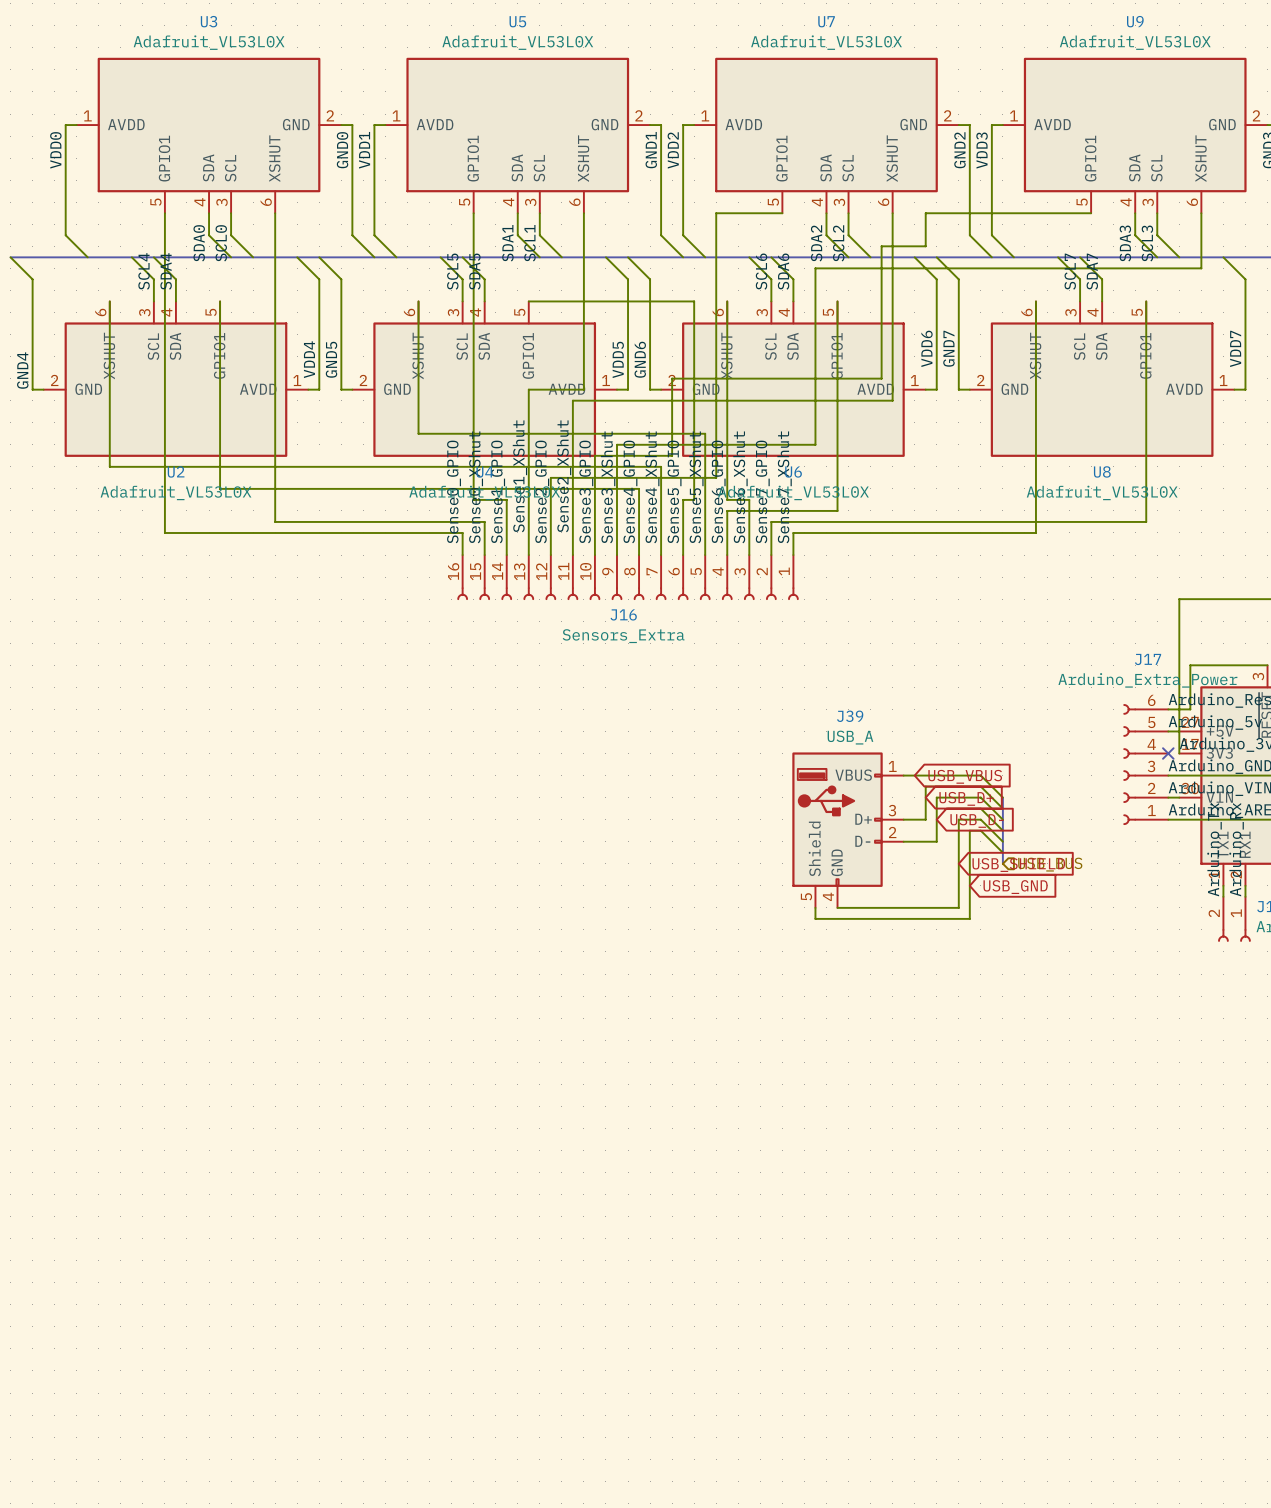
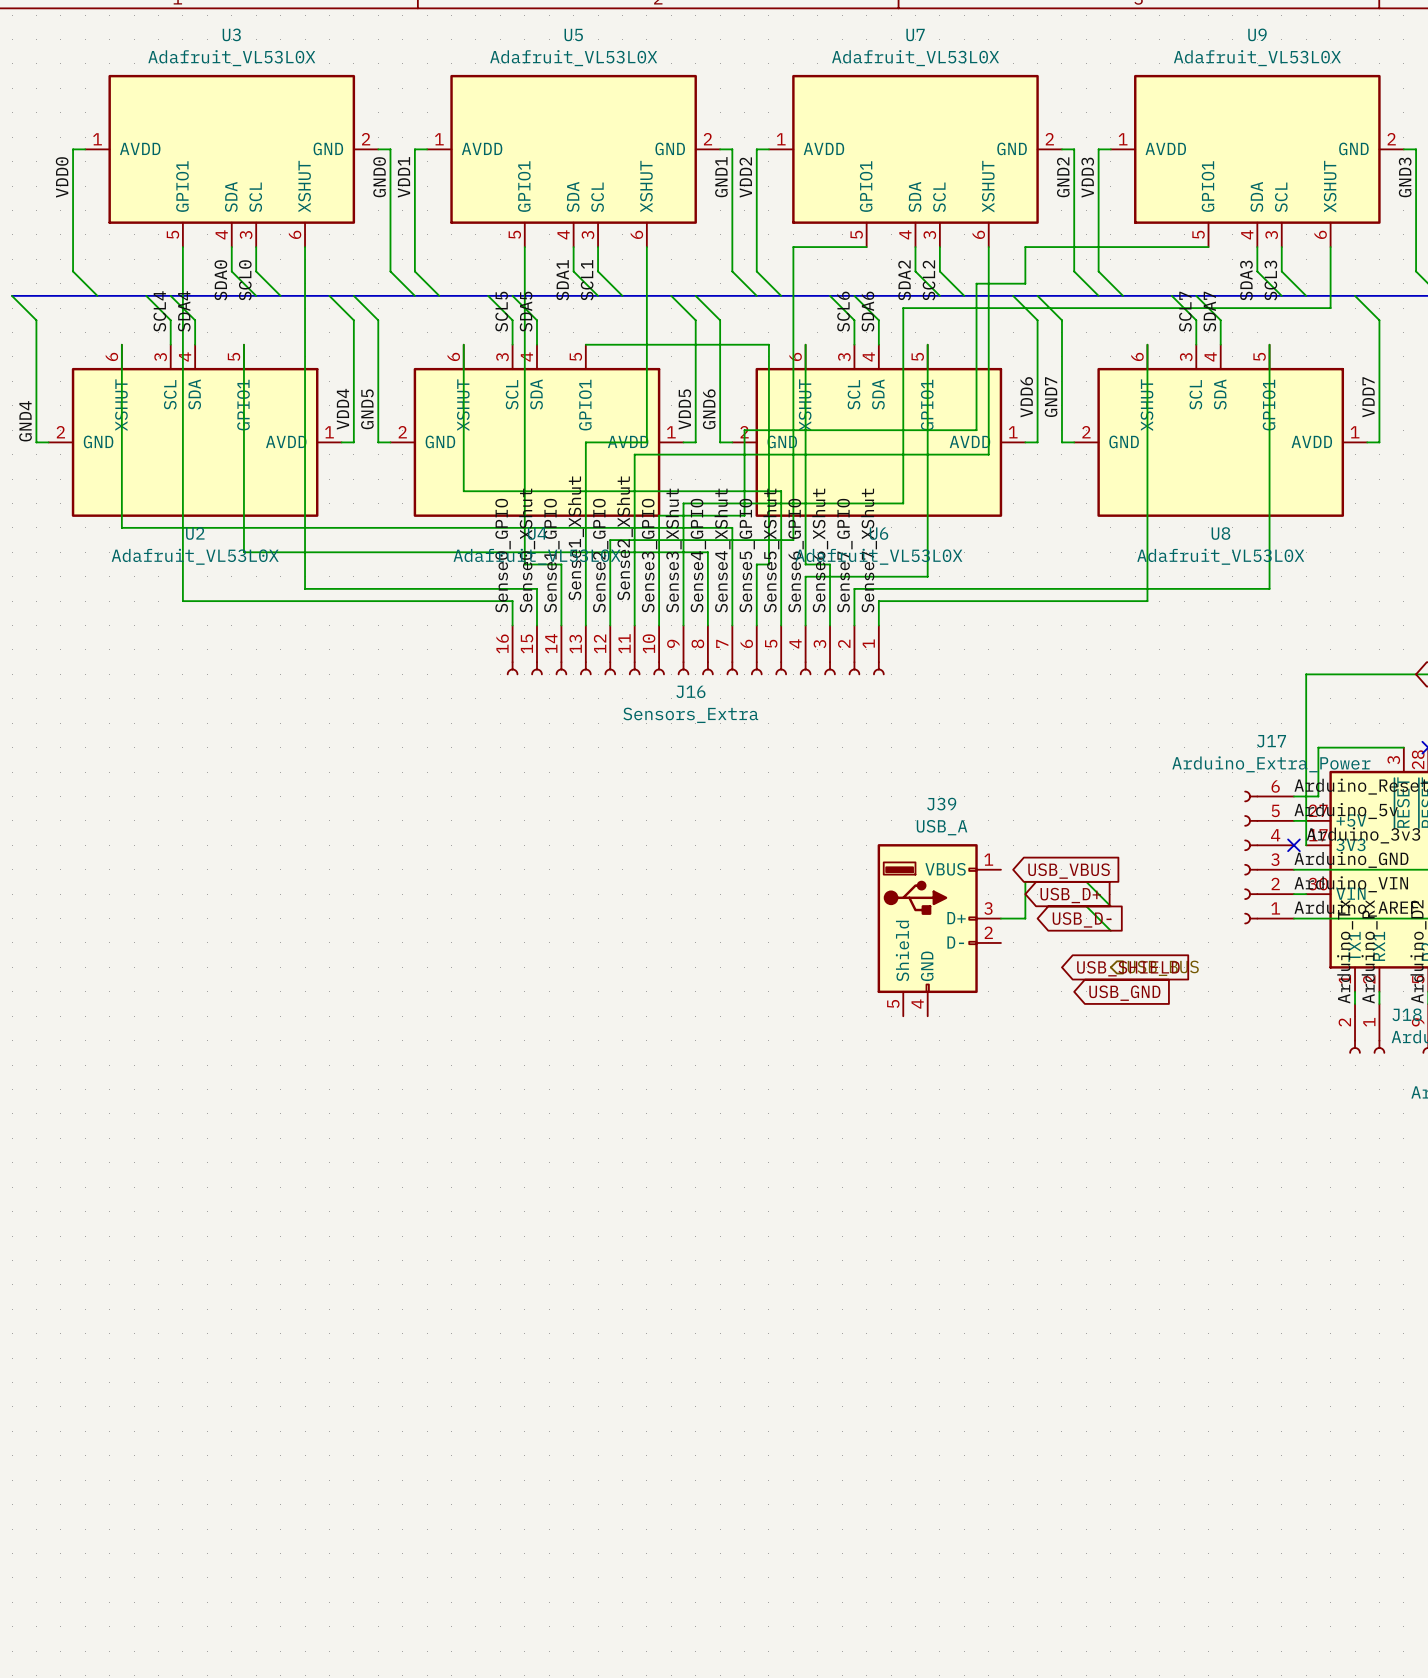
wire: (903, 775) (980, 775) (1002, 797) -> none
bus: (1002, 797) (1002, 863) -> none
wire: (1002, 819) (980, 797) (936, 797) (936, 841) (903, 841) -> none
wire: (1002, 841) (980, 819) (958, 819) (958, 907) (837, 907) -> none
wire: (1002, 852) (980, 830) (969, 830) (969, 918) (815, 918) (815, 907) -> none

